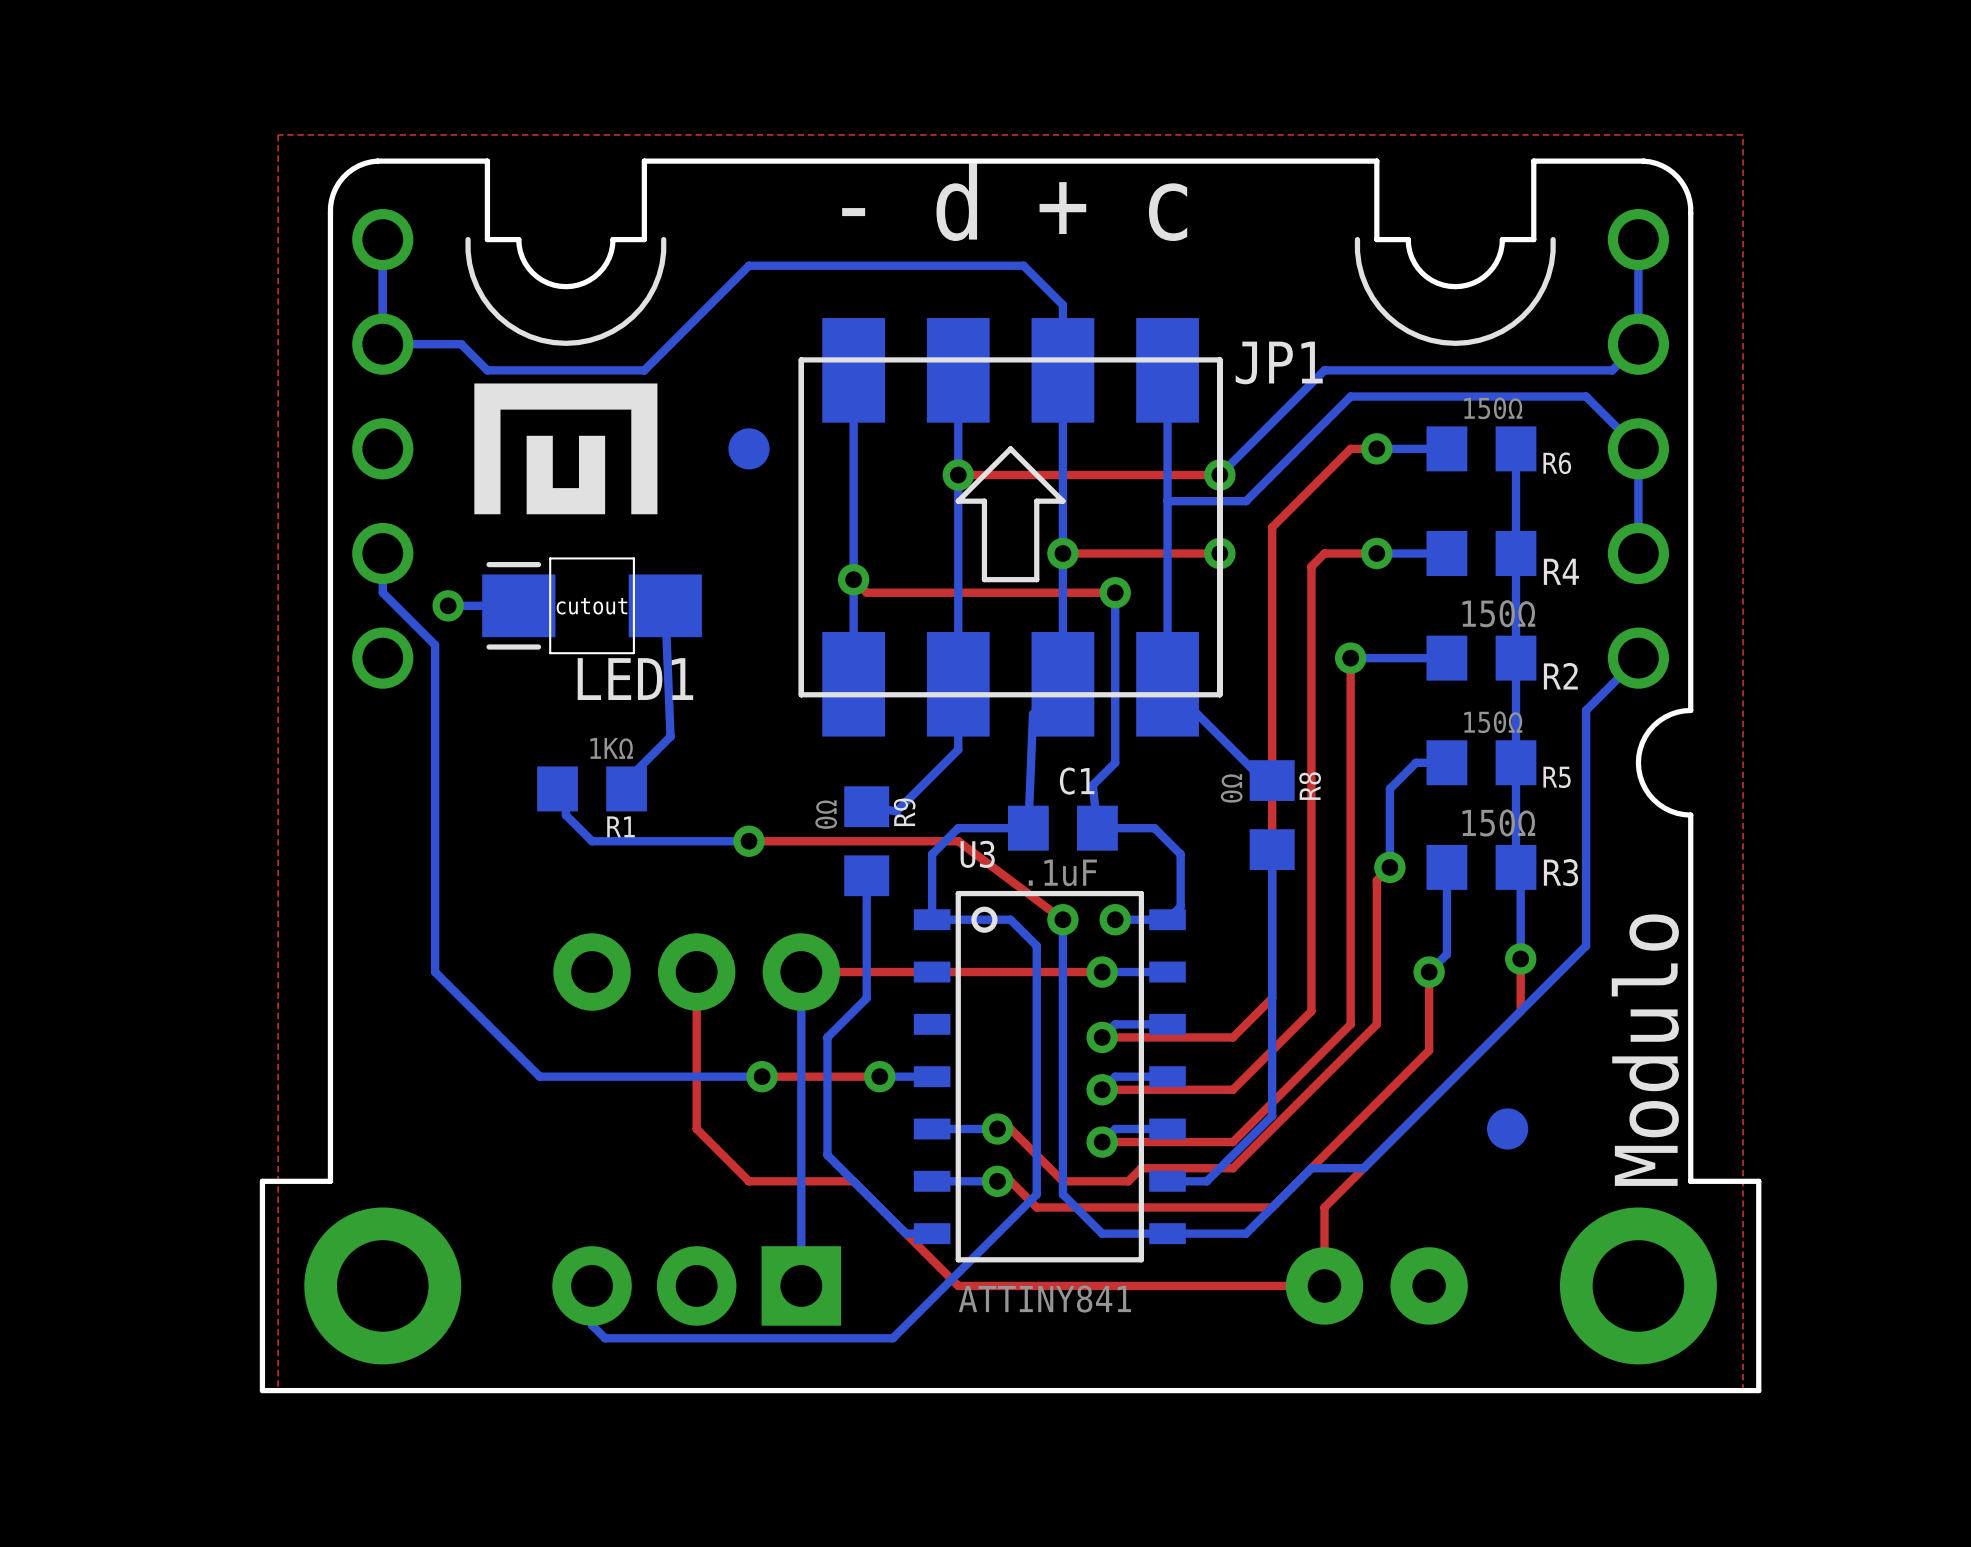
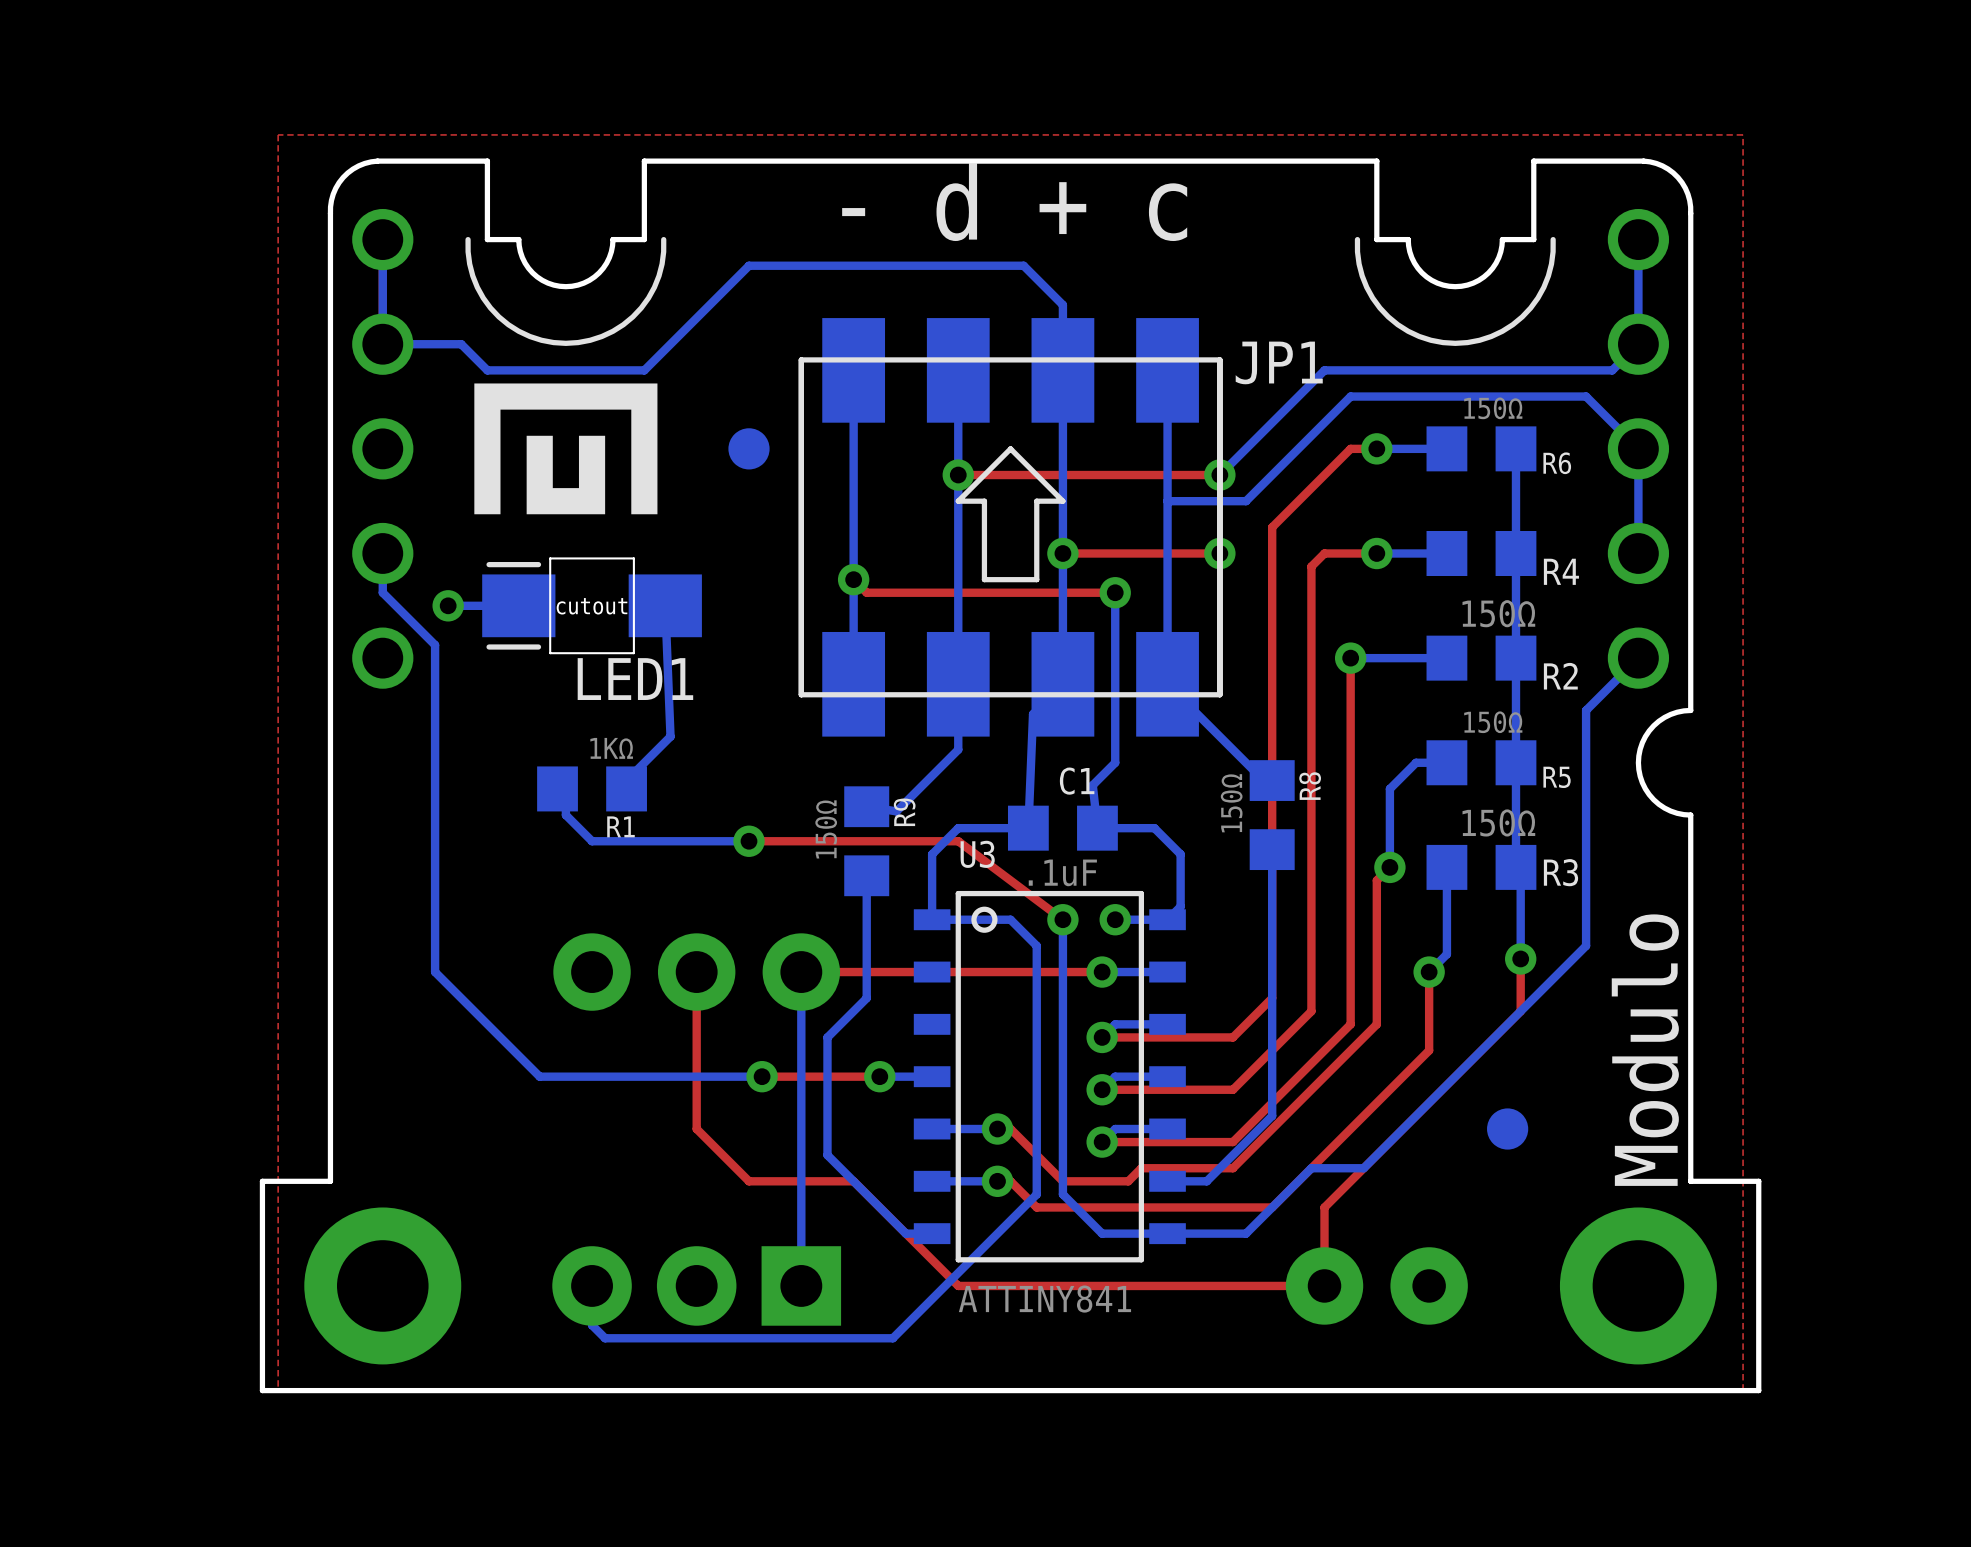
R8 value: 0Ω (1231, 788) -> 150Ω (1231, 803)
R9 value: 0Ω (826, 814) -> 150Ω (826, 829)

